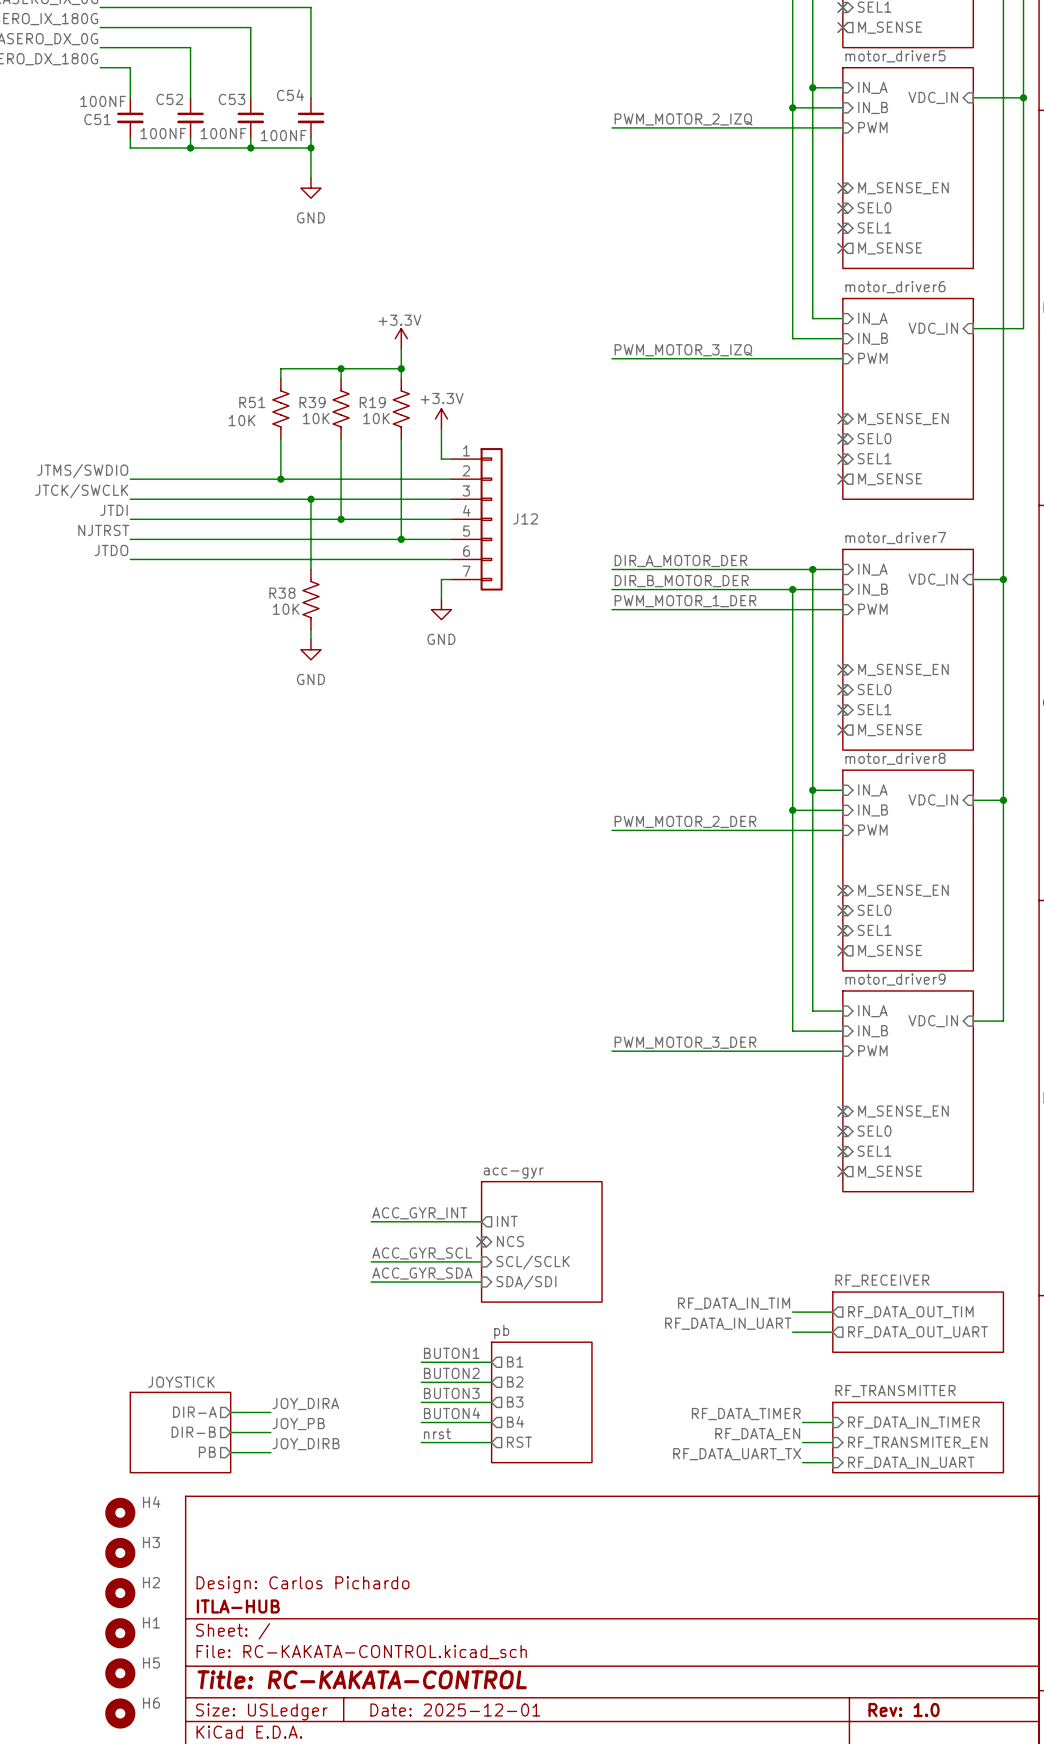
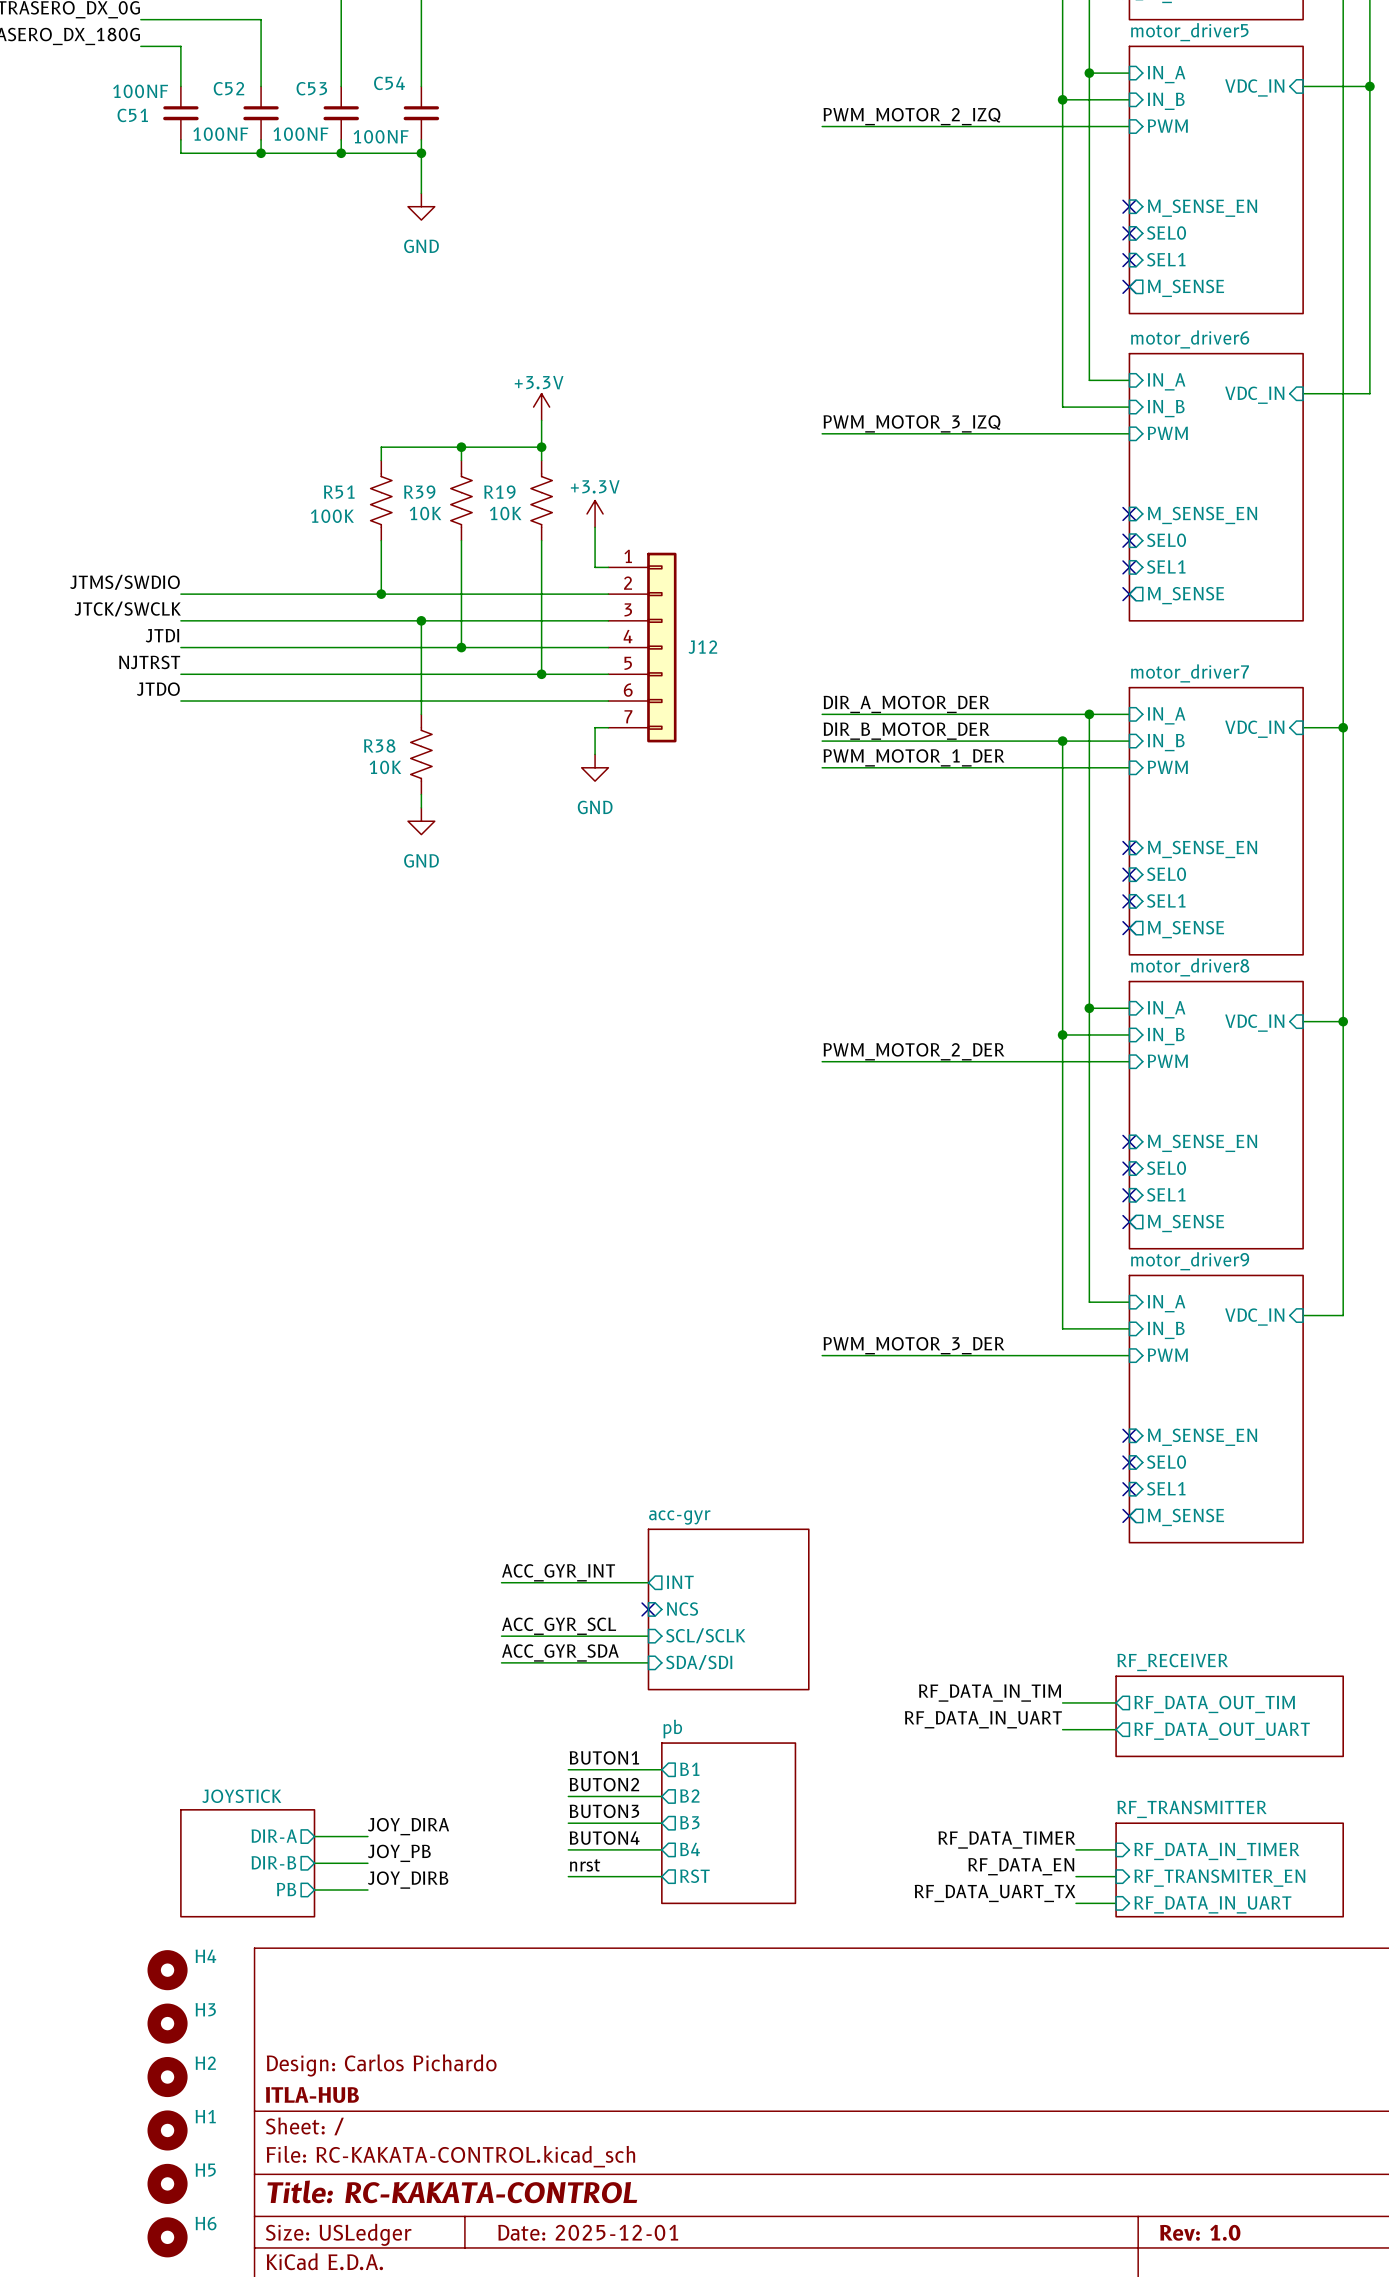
R51 value: 10K (242, 420) -> 100K (332, 516)

